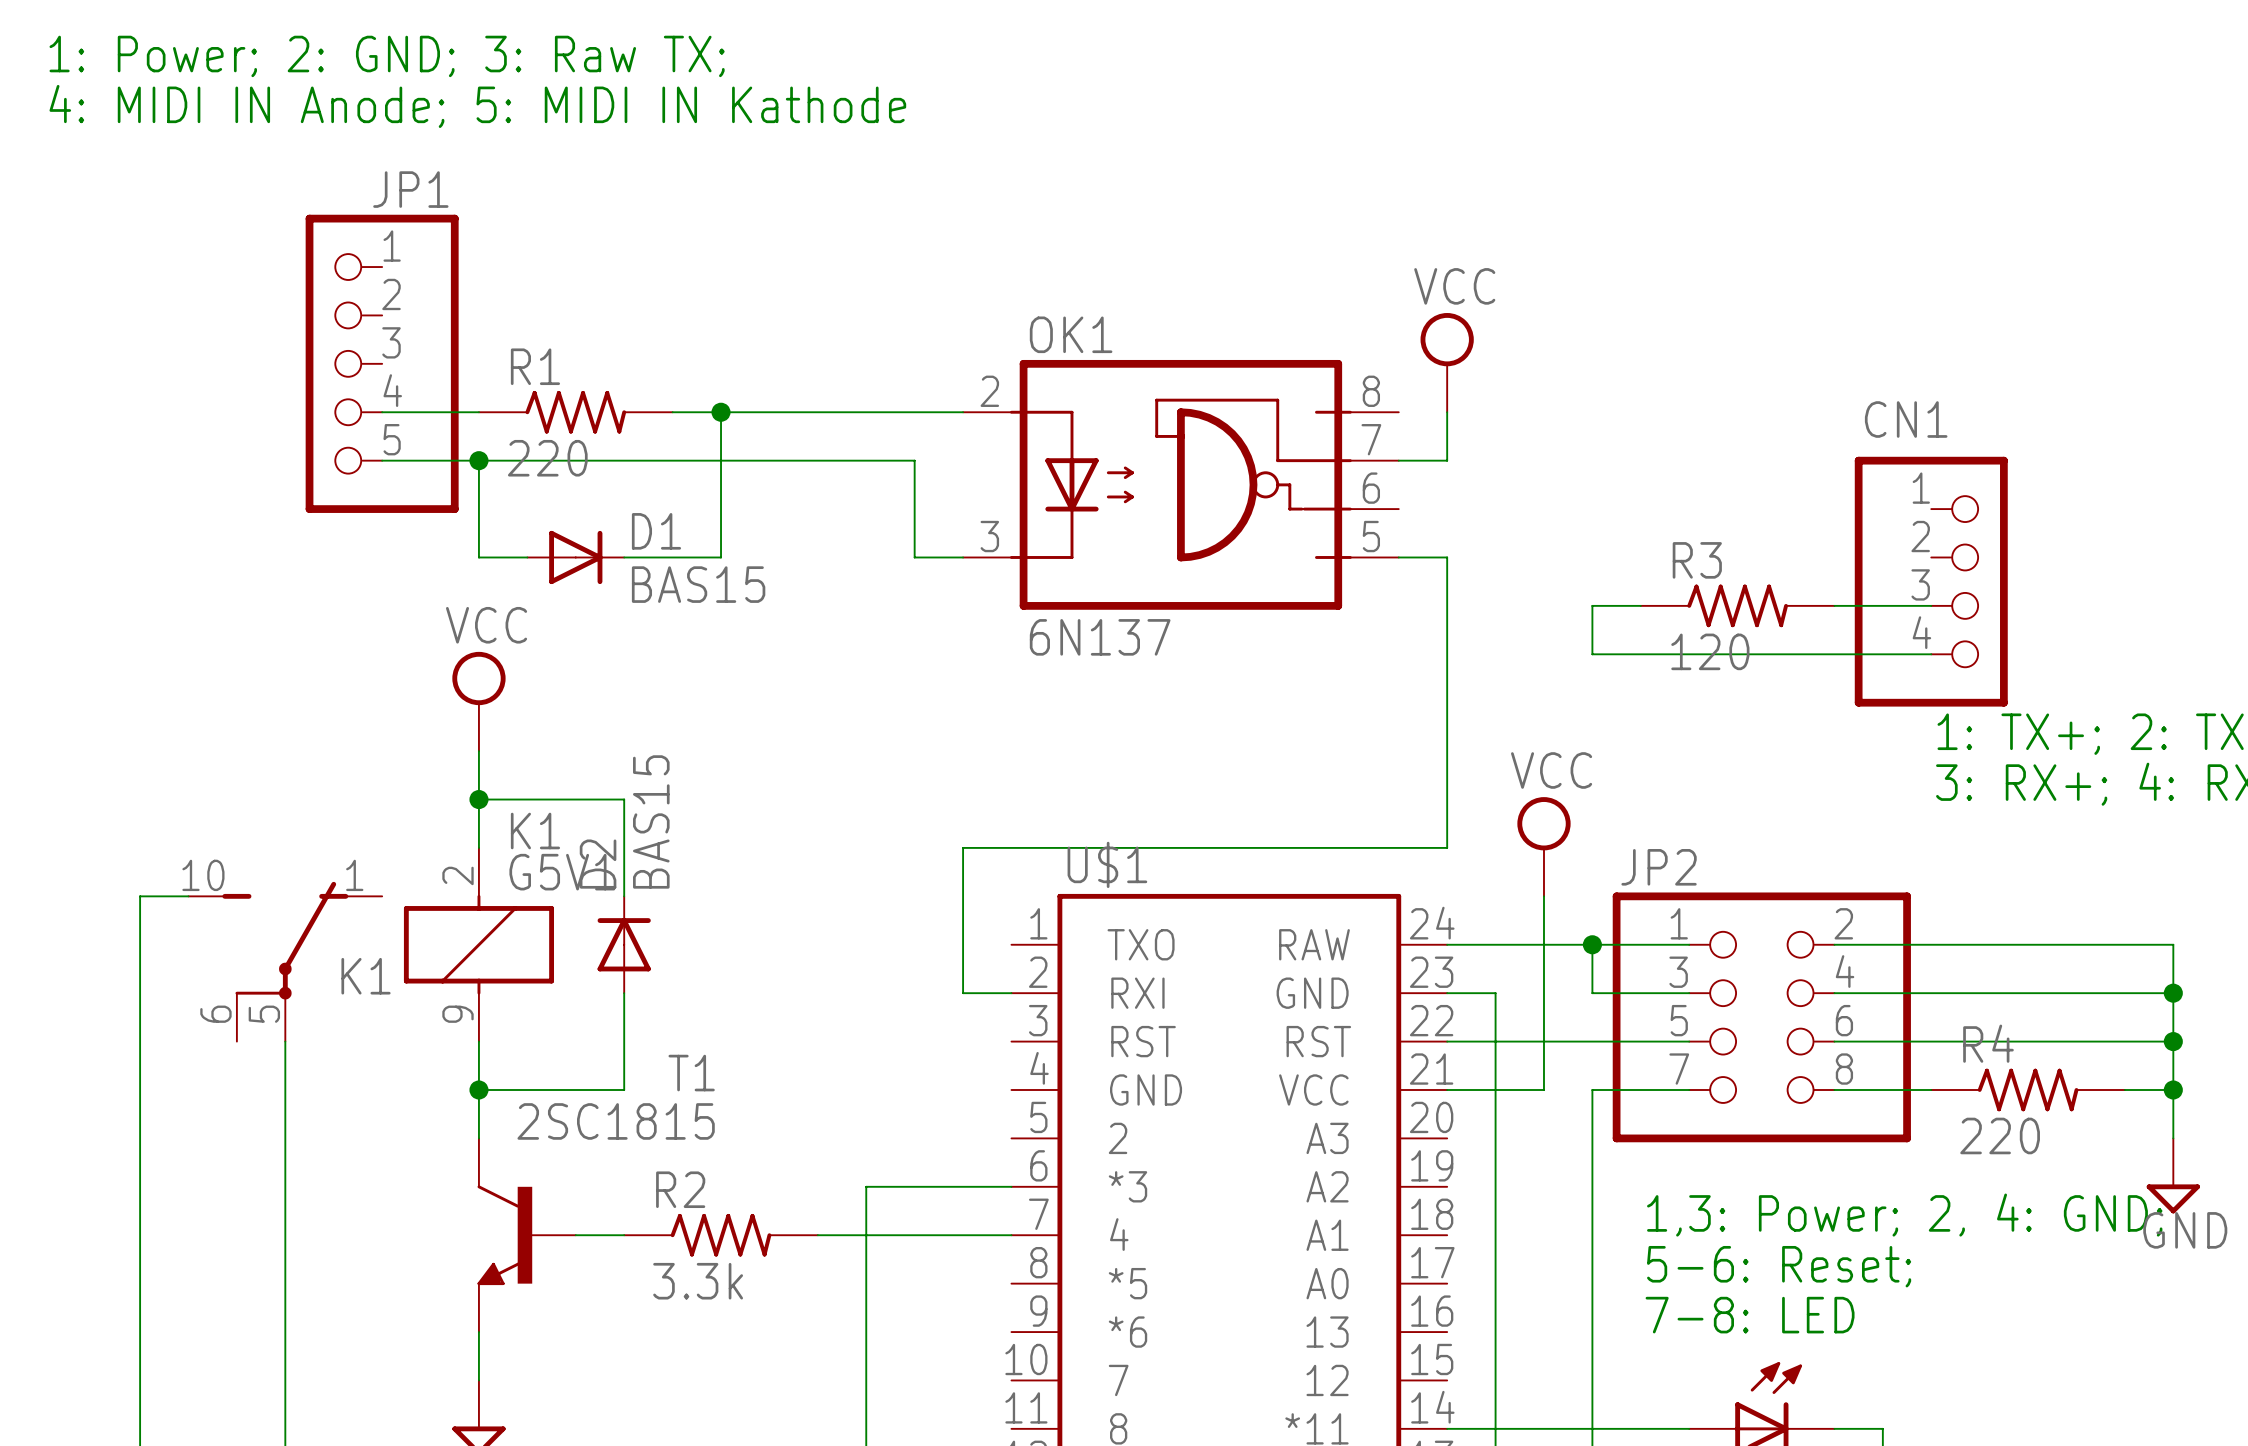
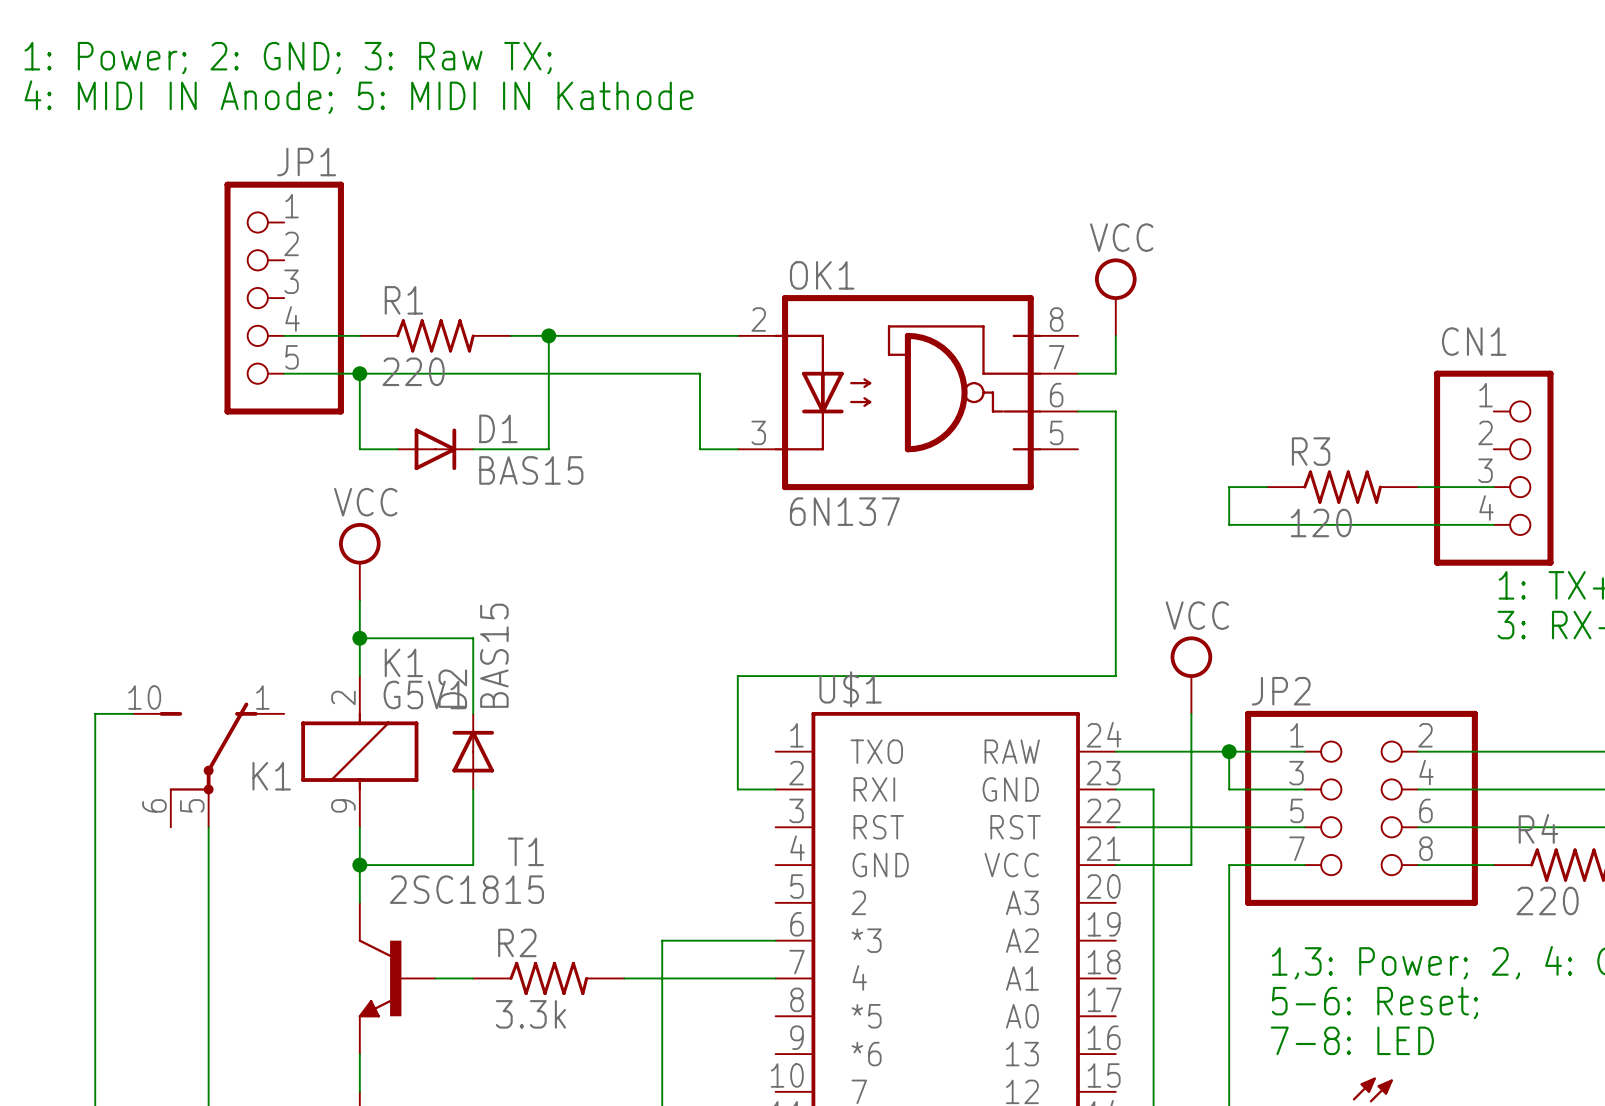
wire: (1398, 557) (1447, 557) -> (1078, 411) (1115, 411) (1115, 449)

